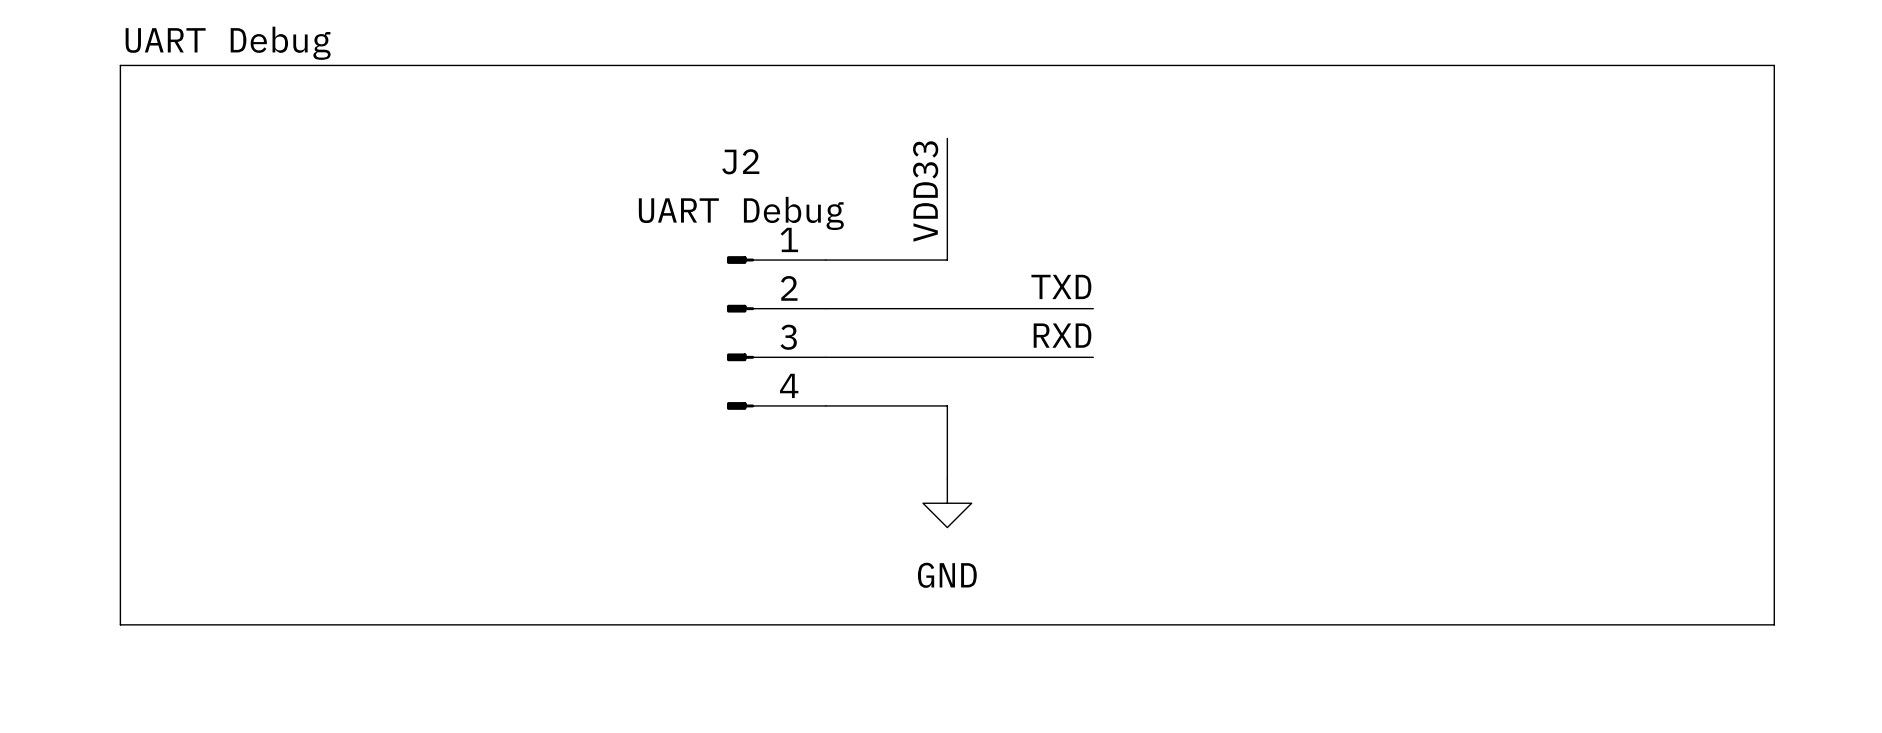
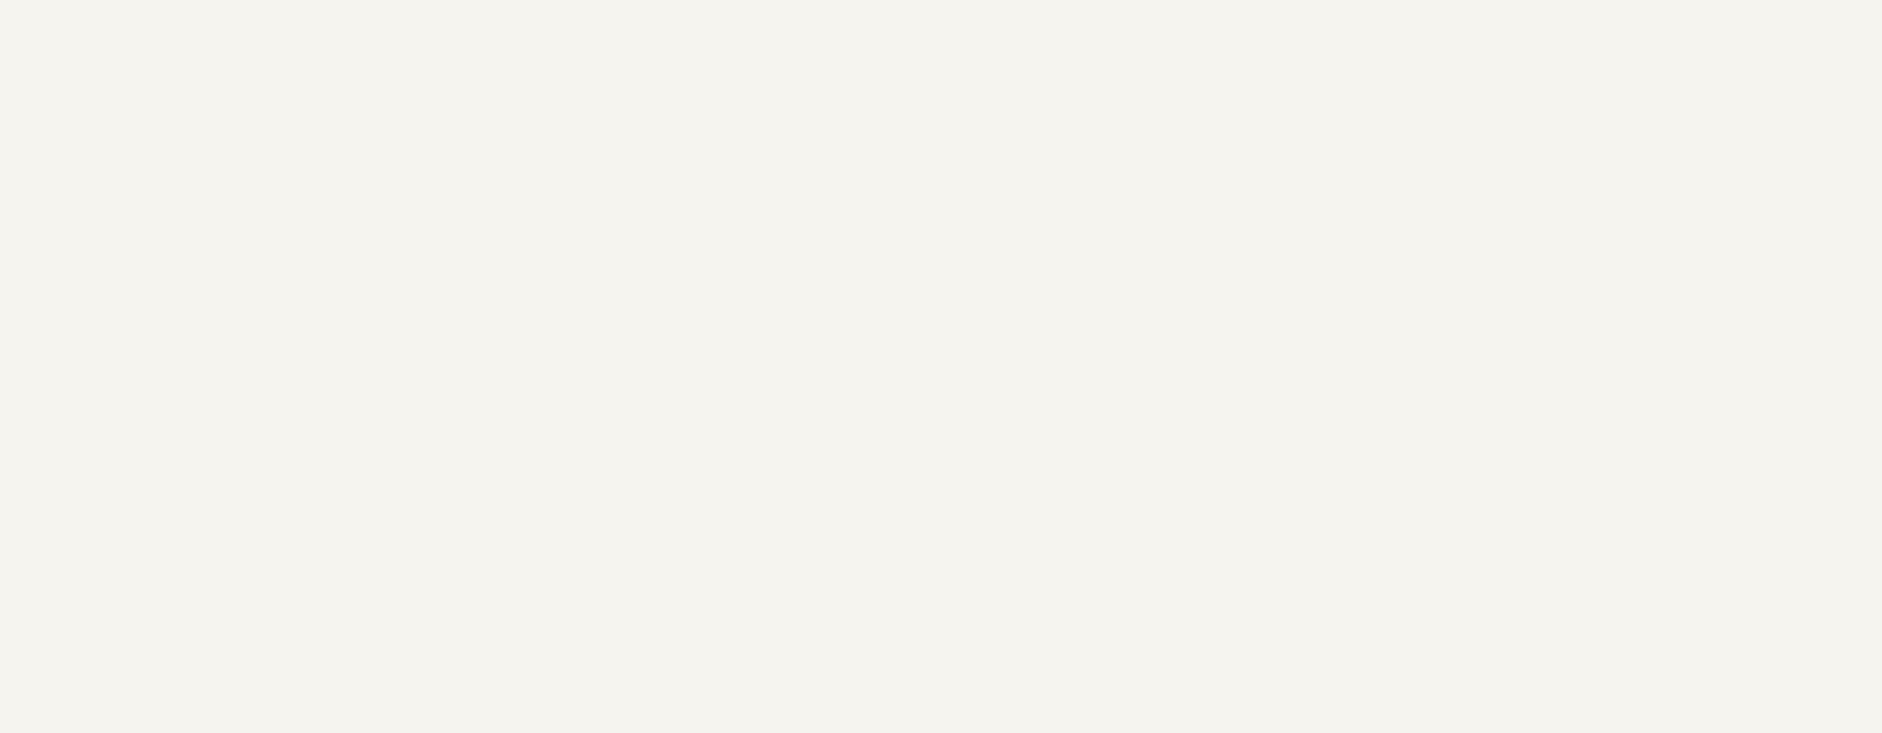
text: UART Debug (228, 43) -> none
line: (120, 65) (120, 624) (1774, 624) (1774, 65) (120, 65) -> none
wire: (947, 138) (947, 260) (825, 260) -> none
label: VDD33 (925, 191) -> none
label: TXD (1061, 286) -> none
wire: (825, 308) (1093, 308) -> none
J2: UART Debug (776, 332) -> none
label: RXD (1062, 335) -> none
wire: (825, 357) (1093, 357) -> none
wire: (825, 405) (947, 405) (947, 478) -> none
power symbol: GND (947, 503) -> none

